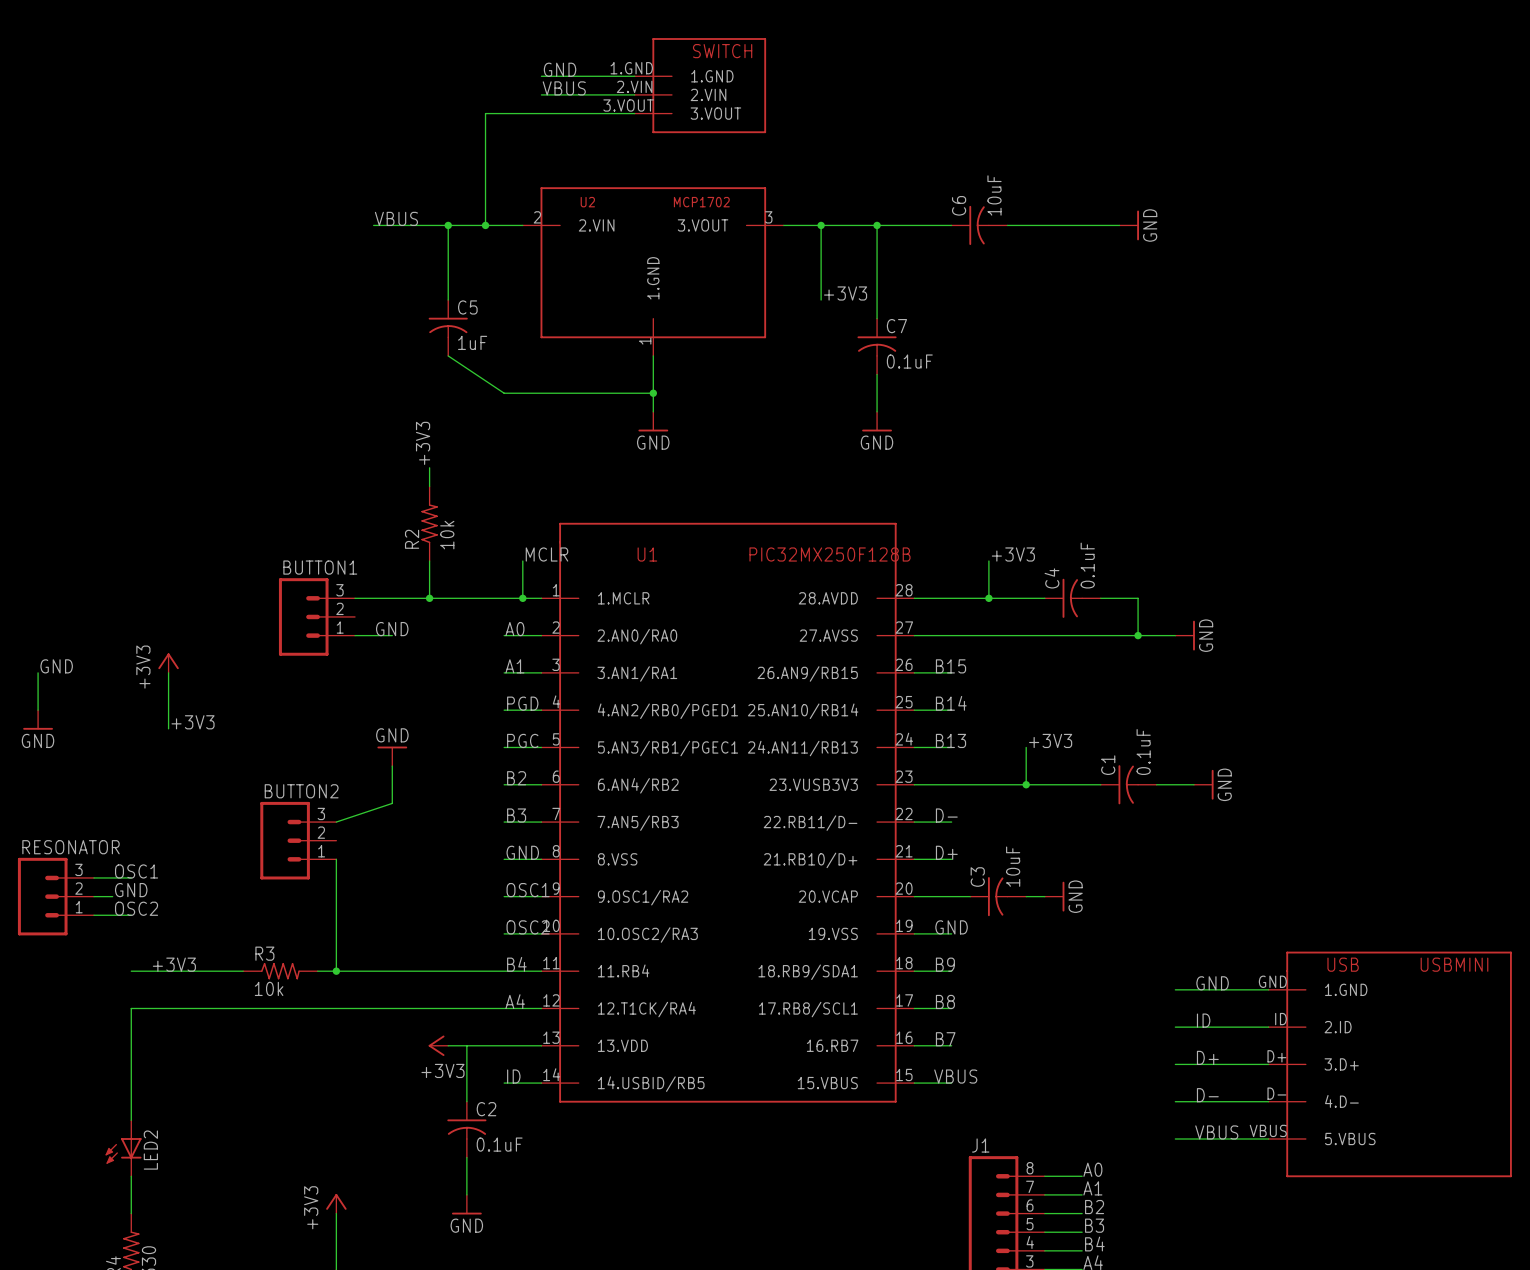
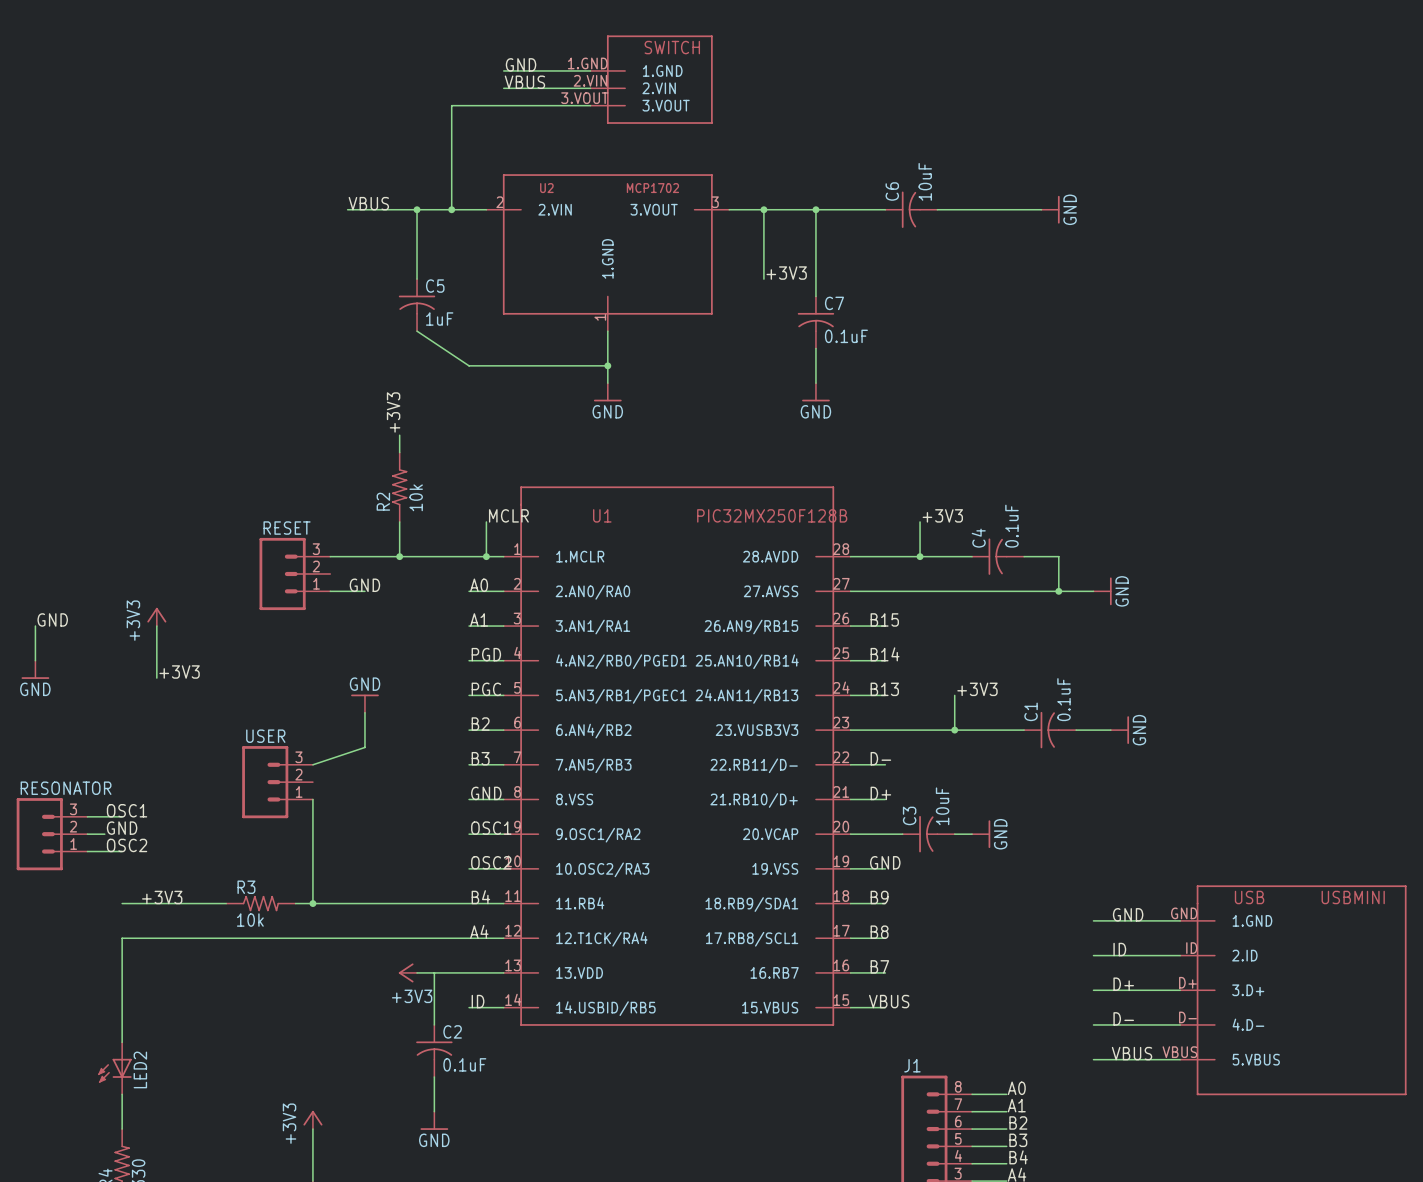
BUTTON1 name: BUTTON1 (320, 567) -> RESET (287, 528)
BUTTON2 name: BUTTON2 (301, 791) -> USER (265, 736)

